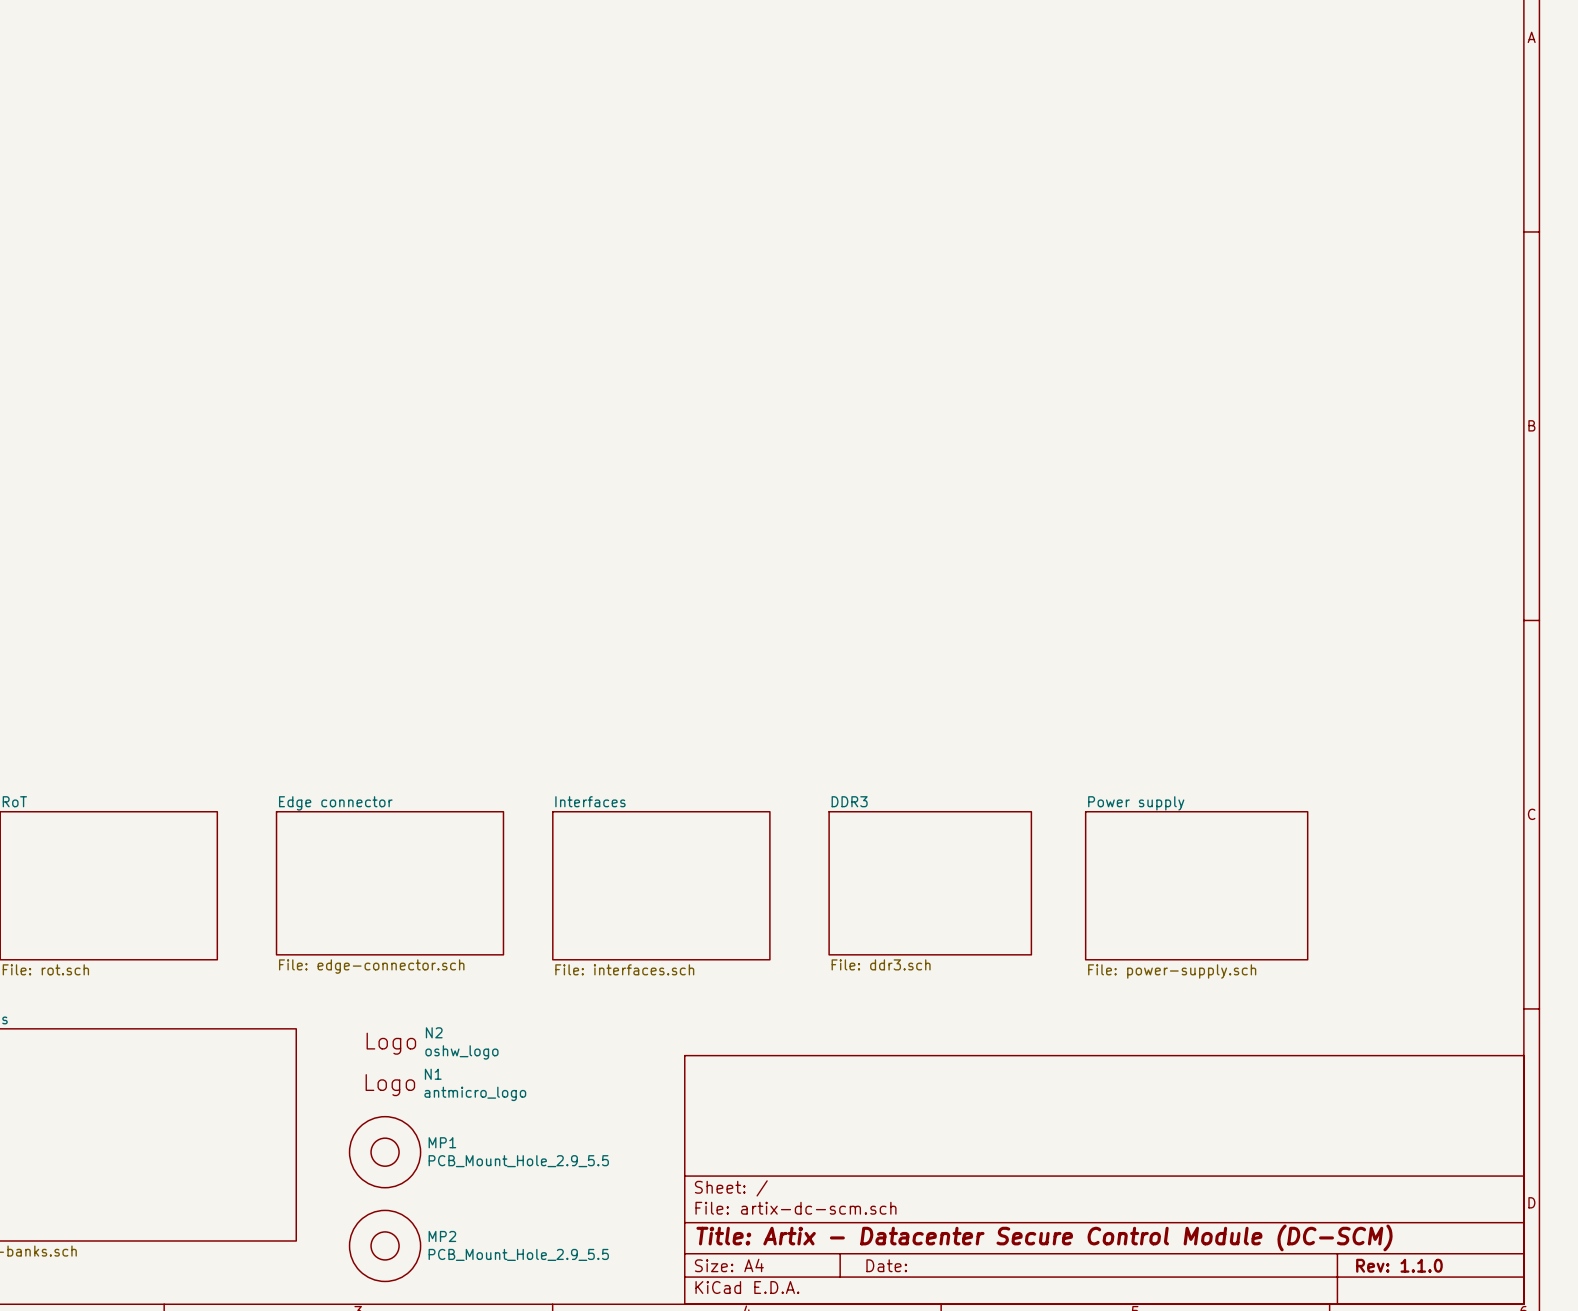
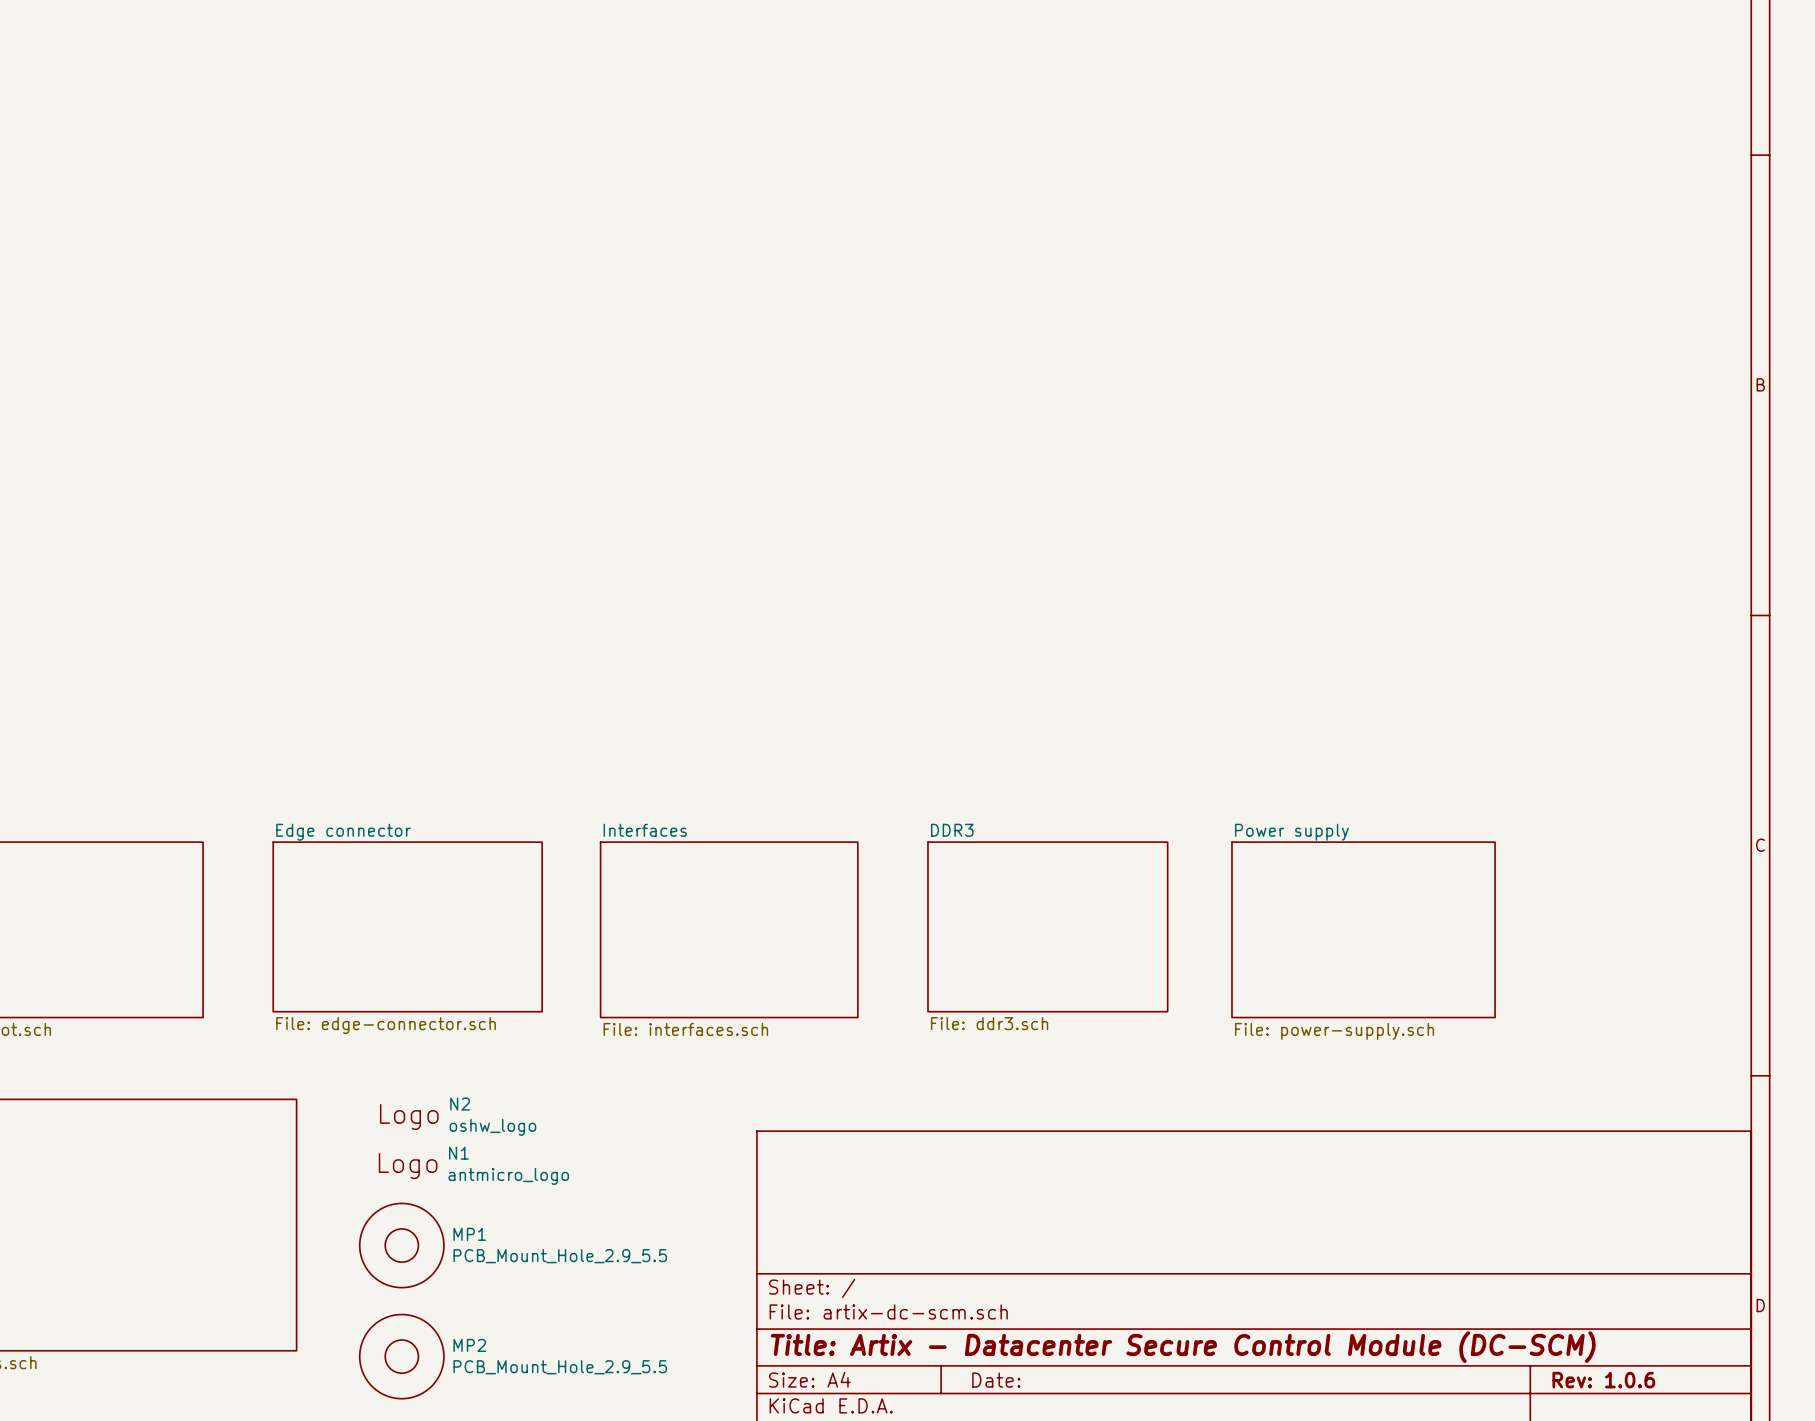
title block: Rev: 1.1.0 (1399, 1265) -> Rev: 1.0.6 (1603, 1380)

